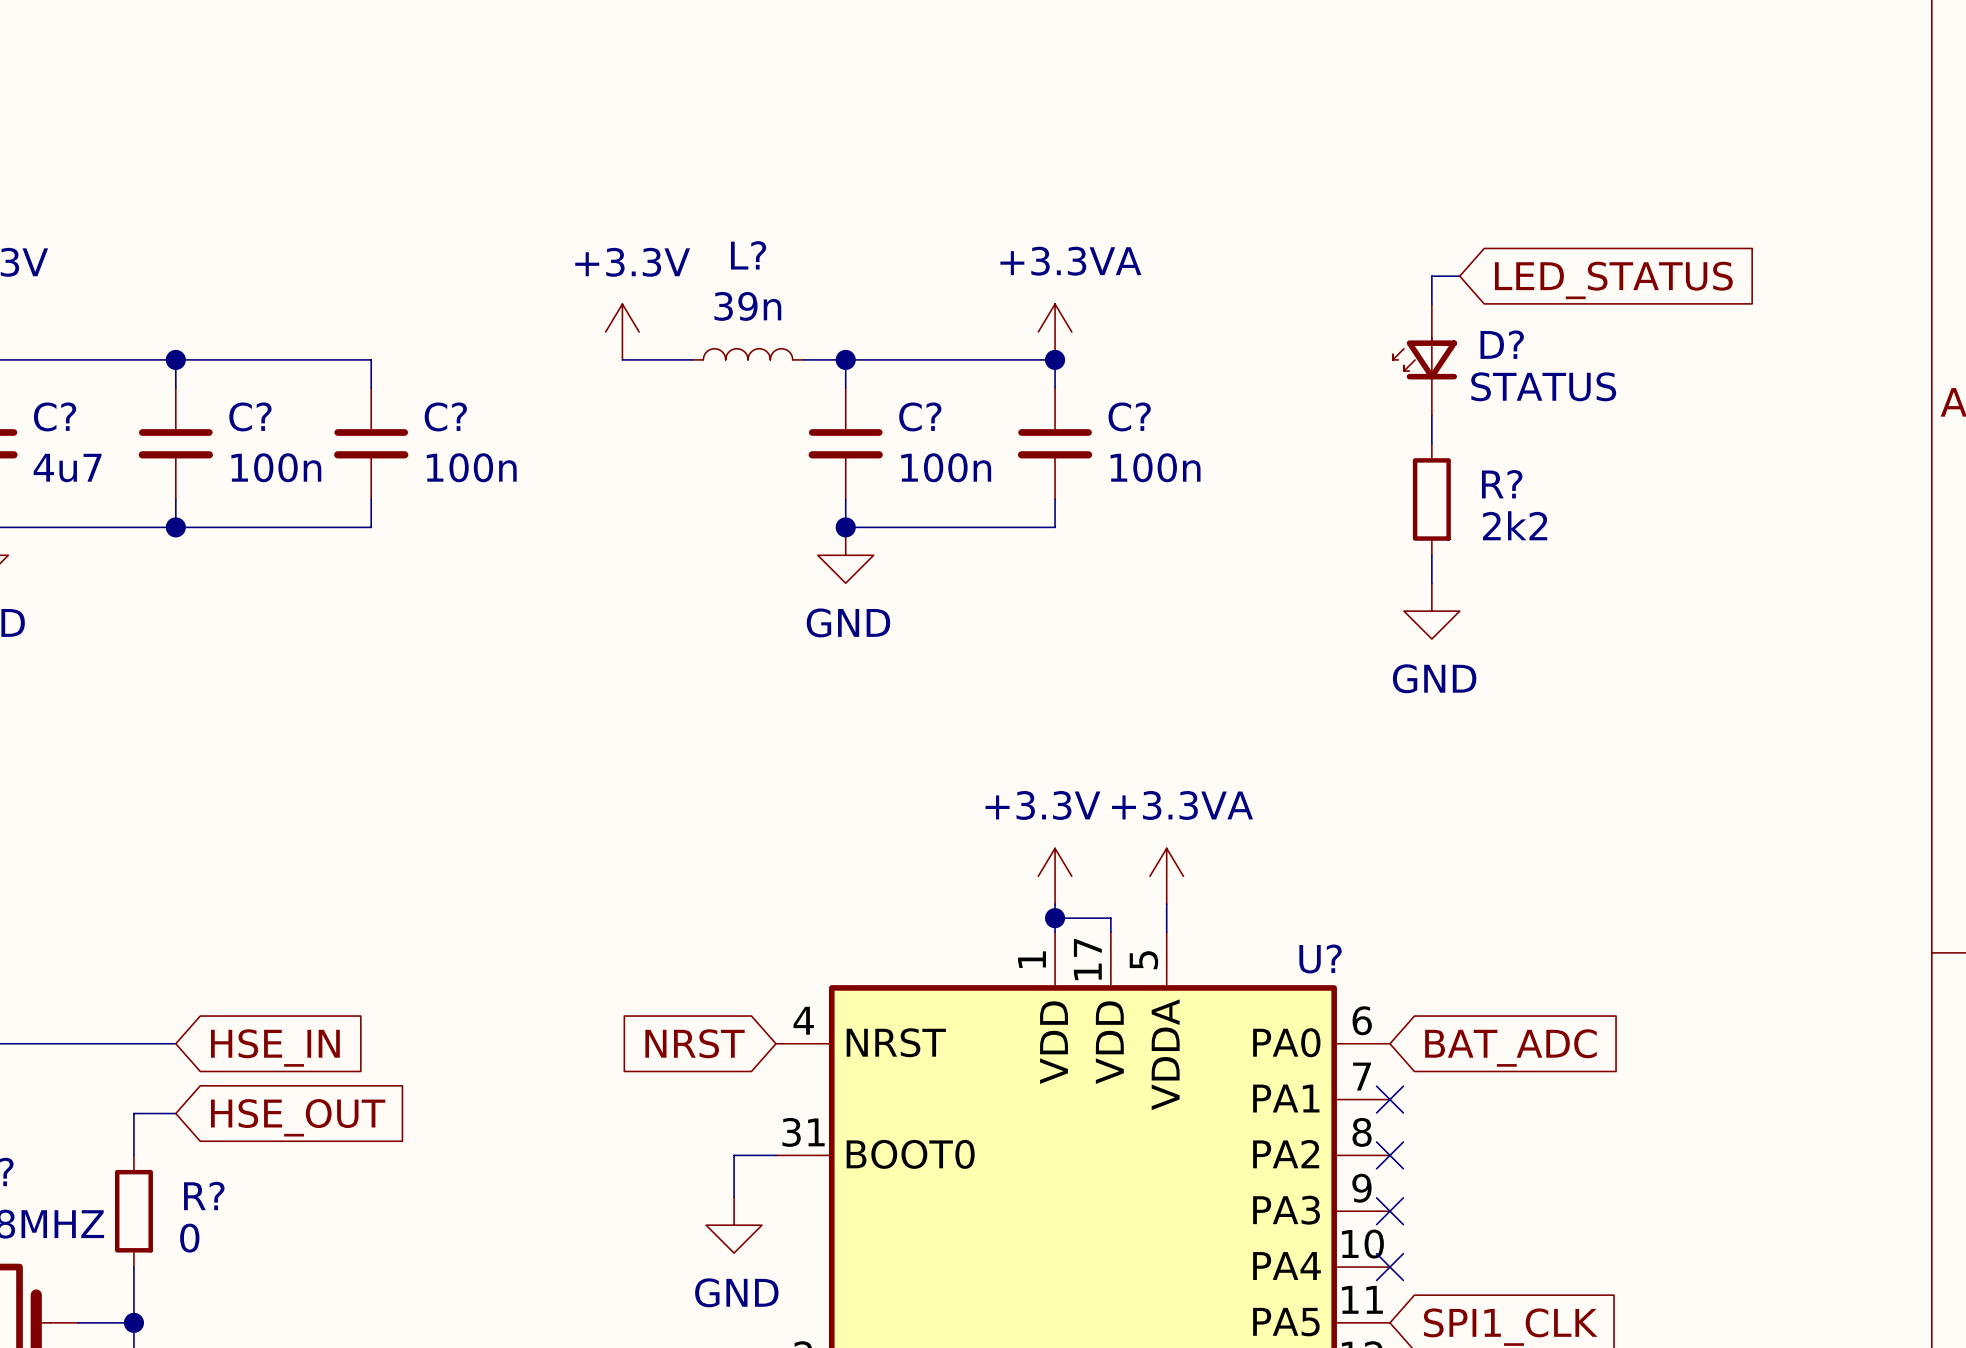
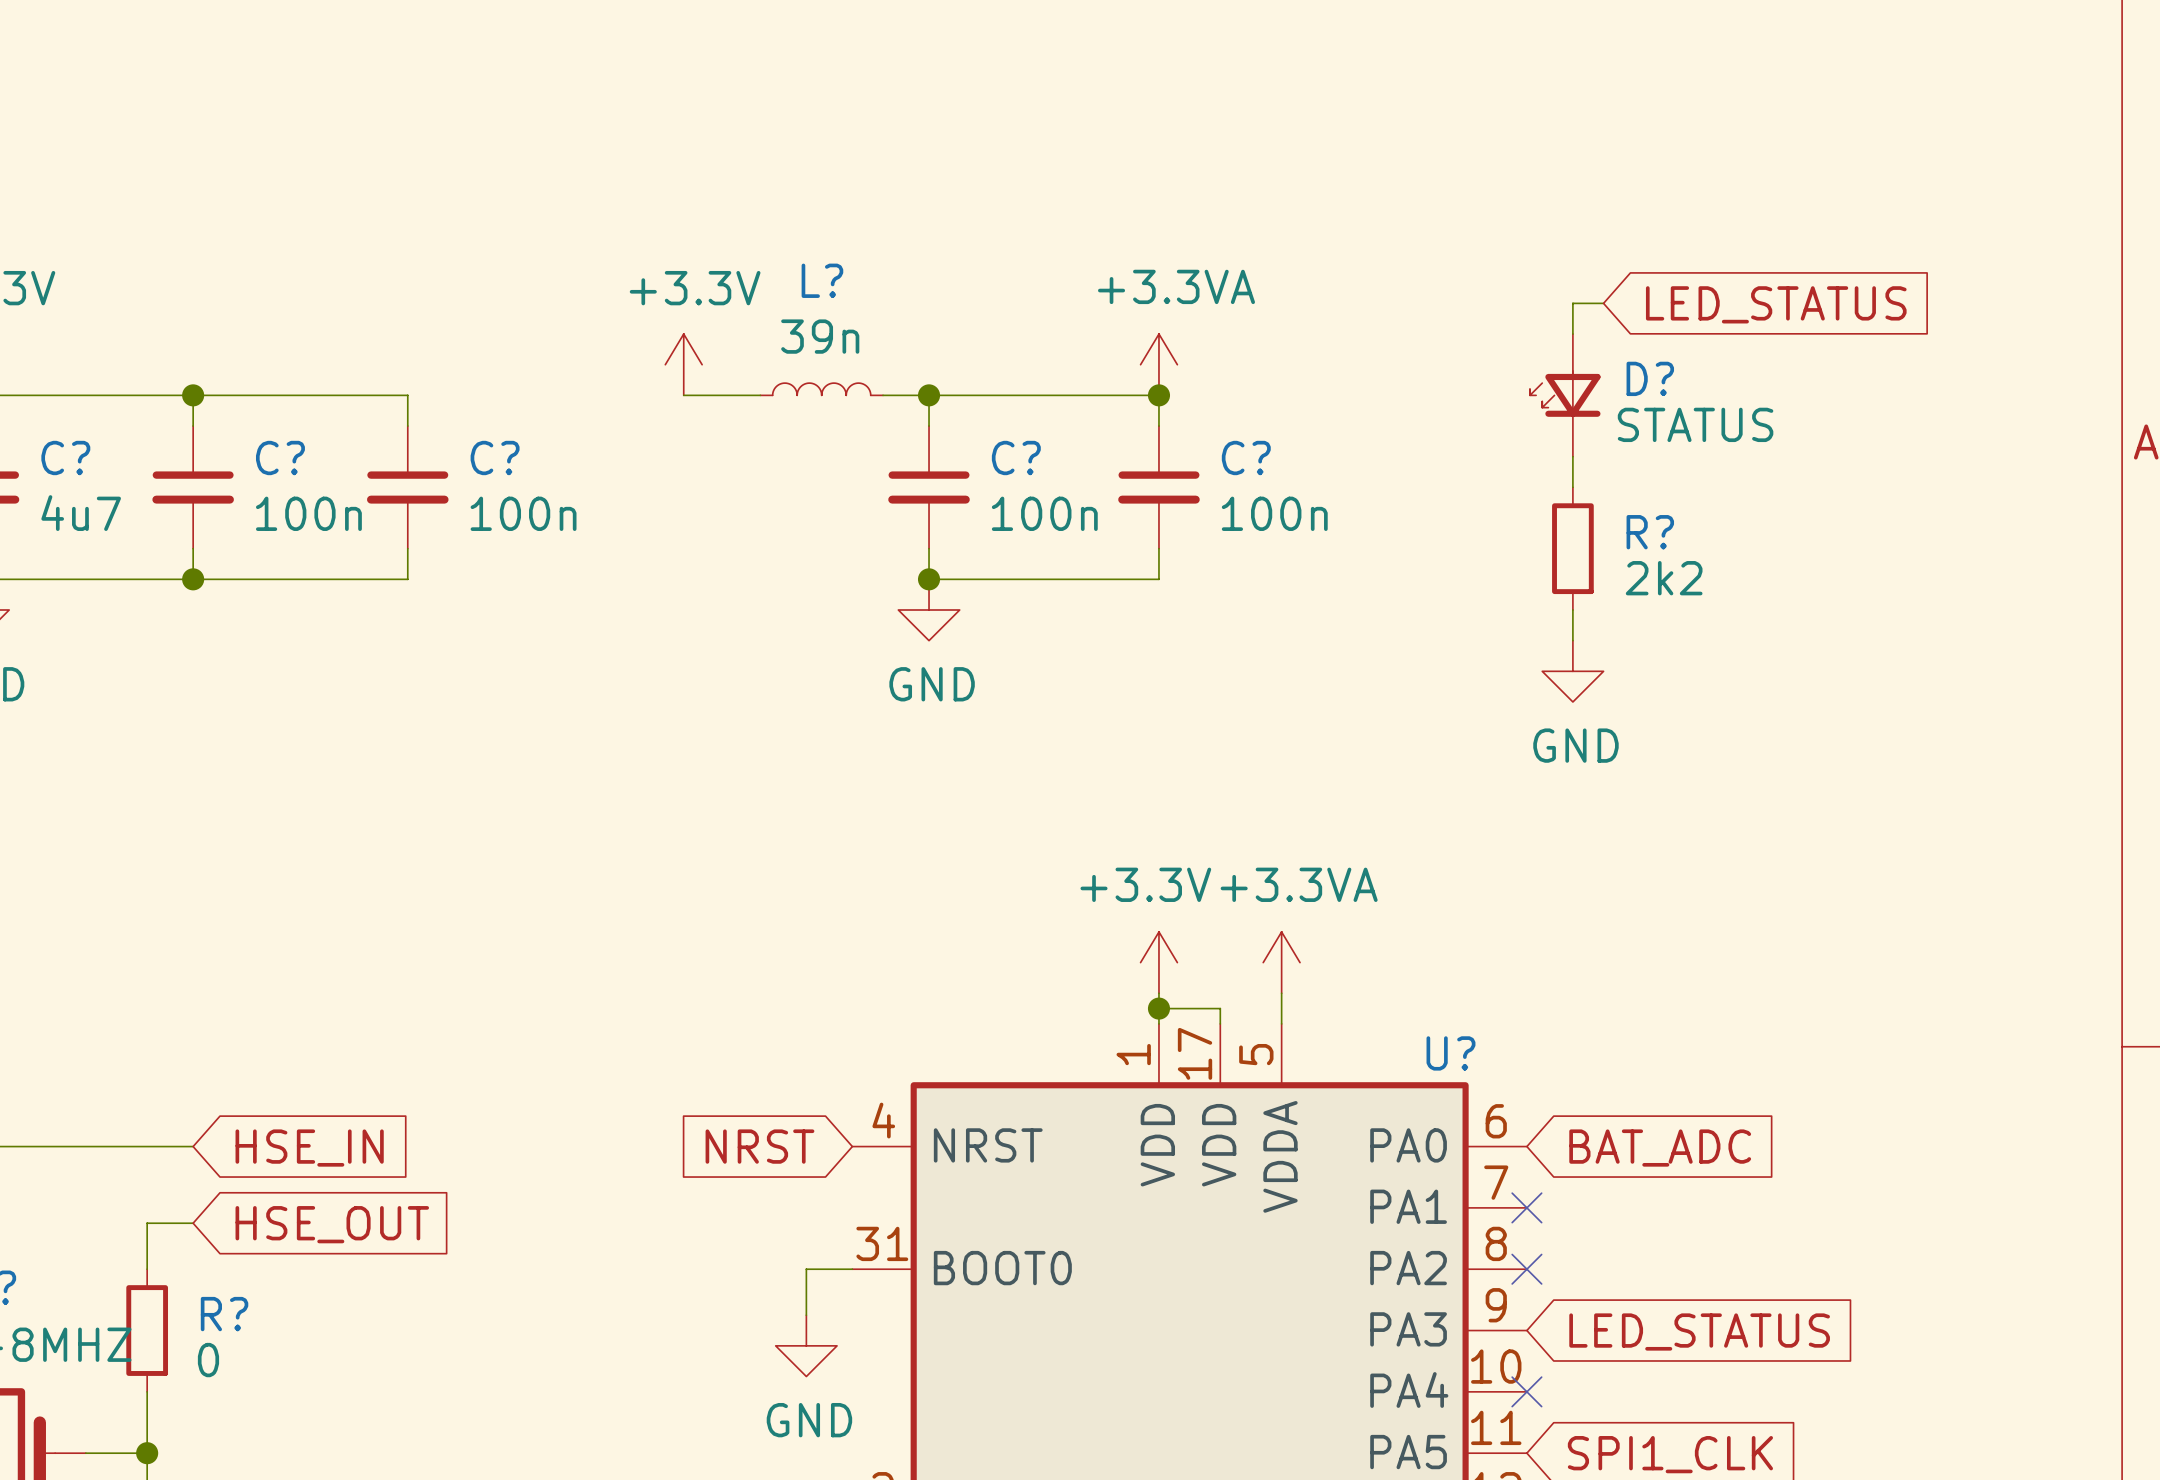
no-connect mark: (1389, 1211) -> none
global label: none -> LED_STATUS (1699, 1332)

